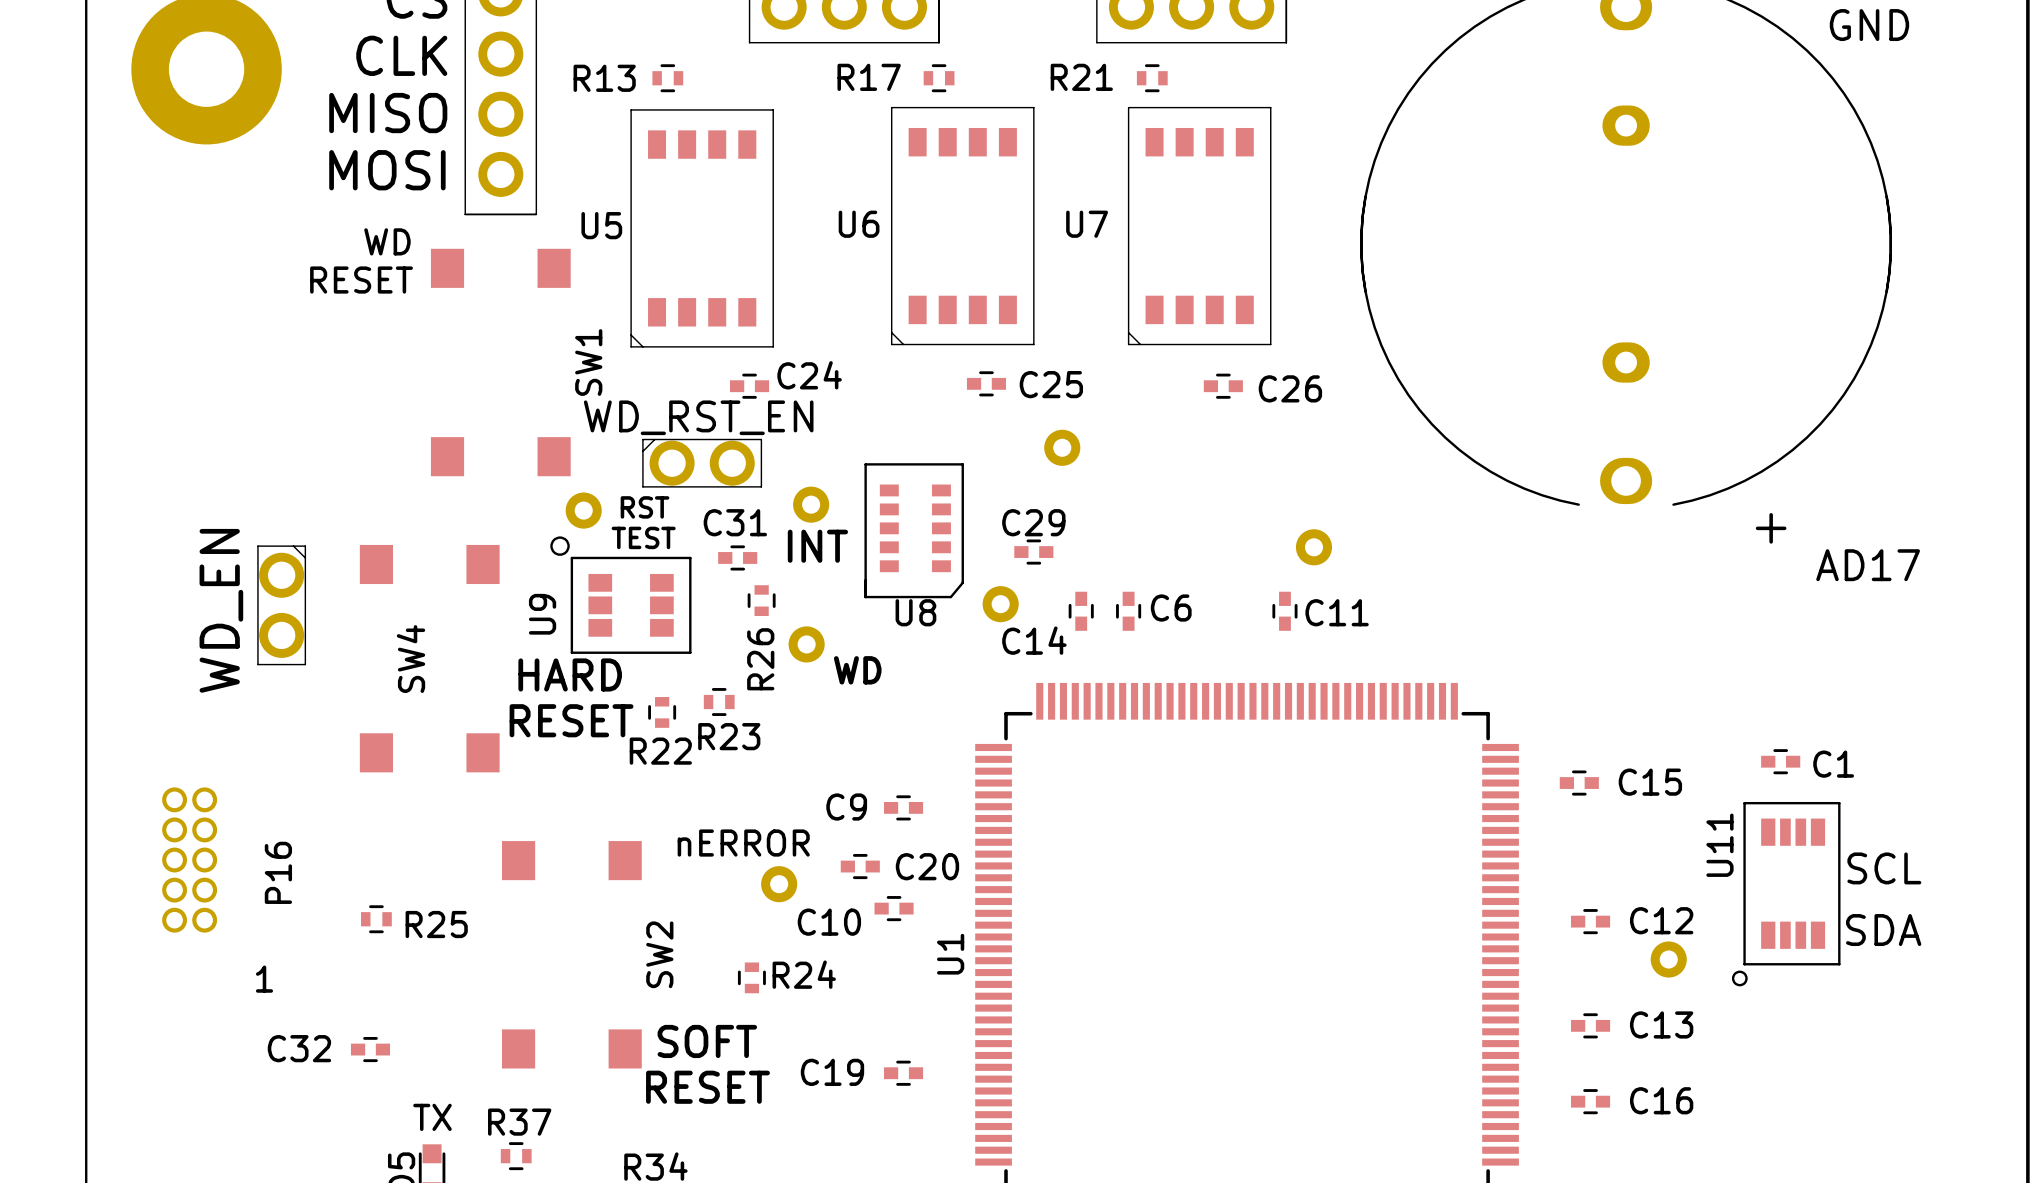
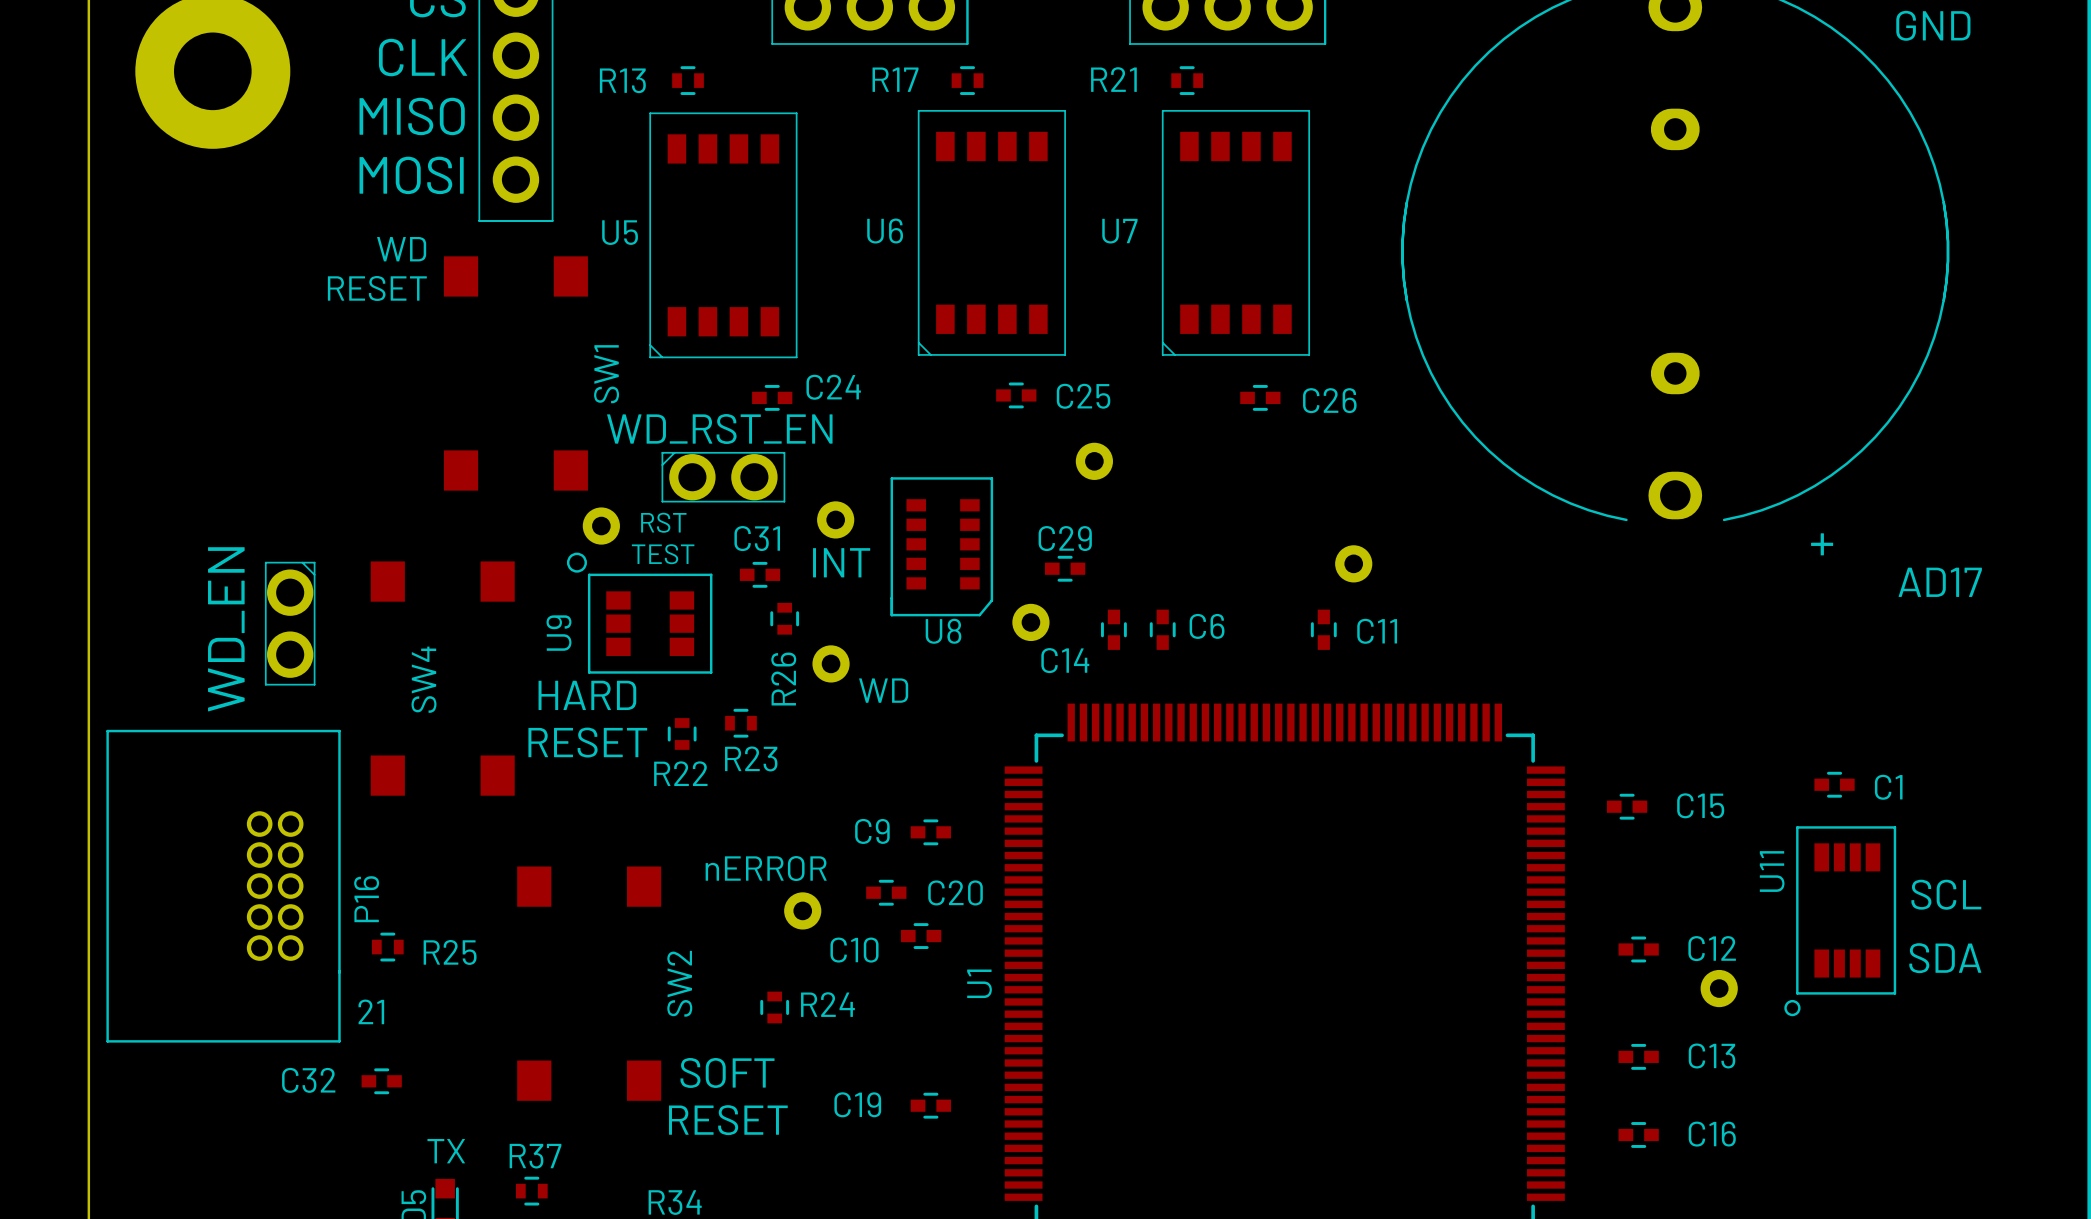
P16 footprint: [162, 787, 218, 933] -> [106, 729, 341, 1043]
P16 name position: P16 (278, 872) -> P16 (366, 899)

